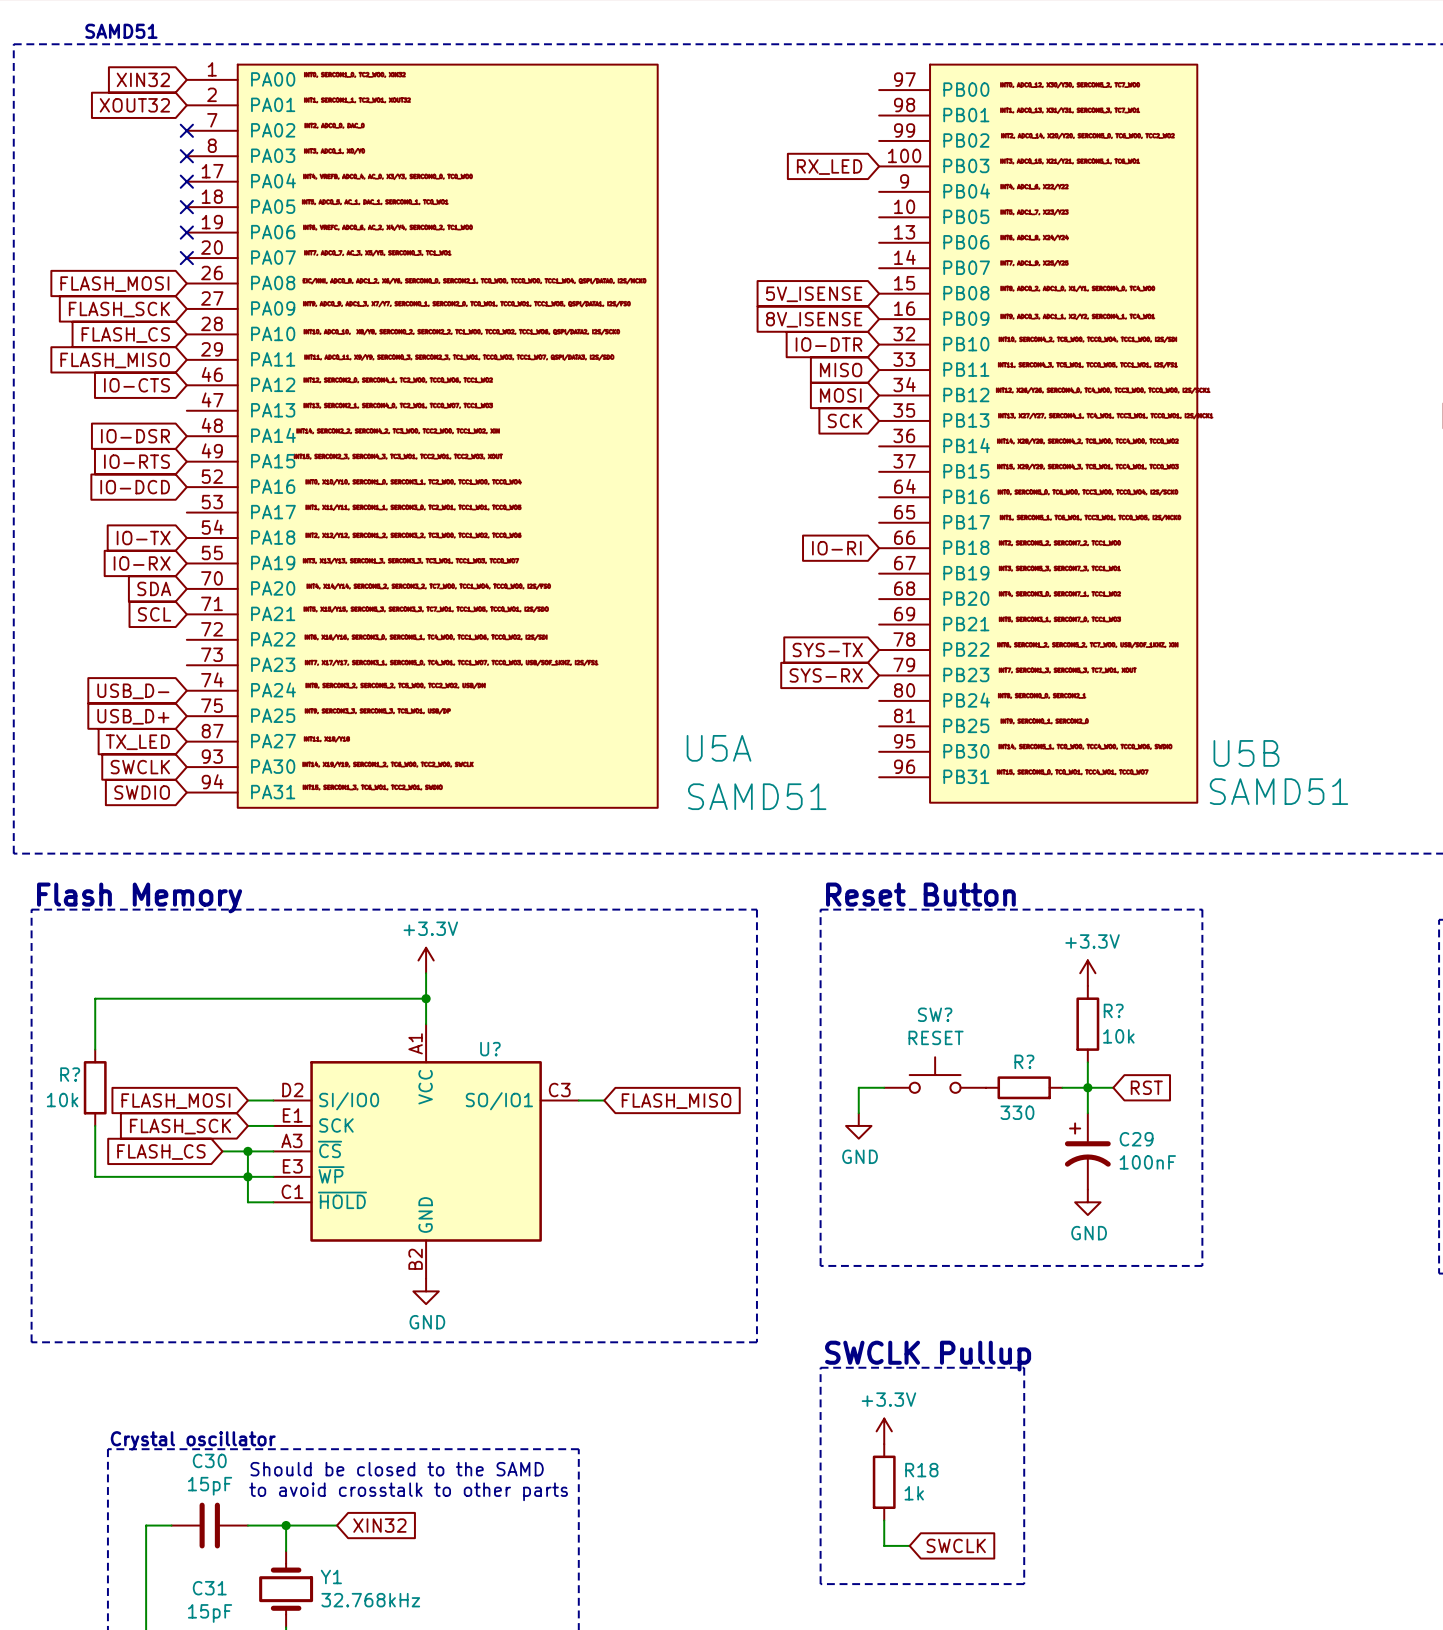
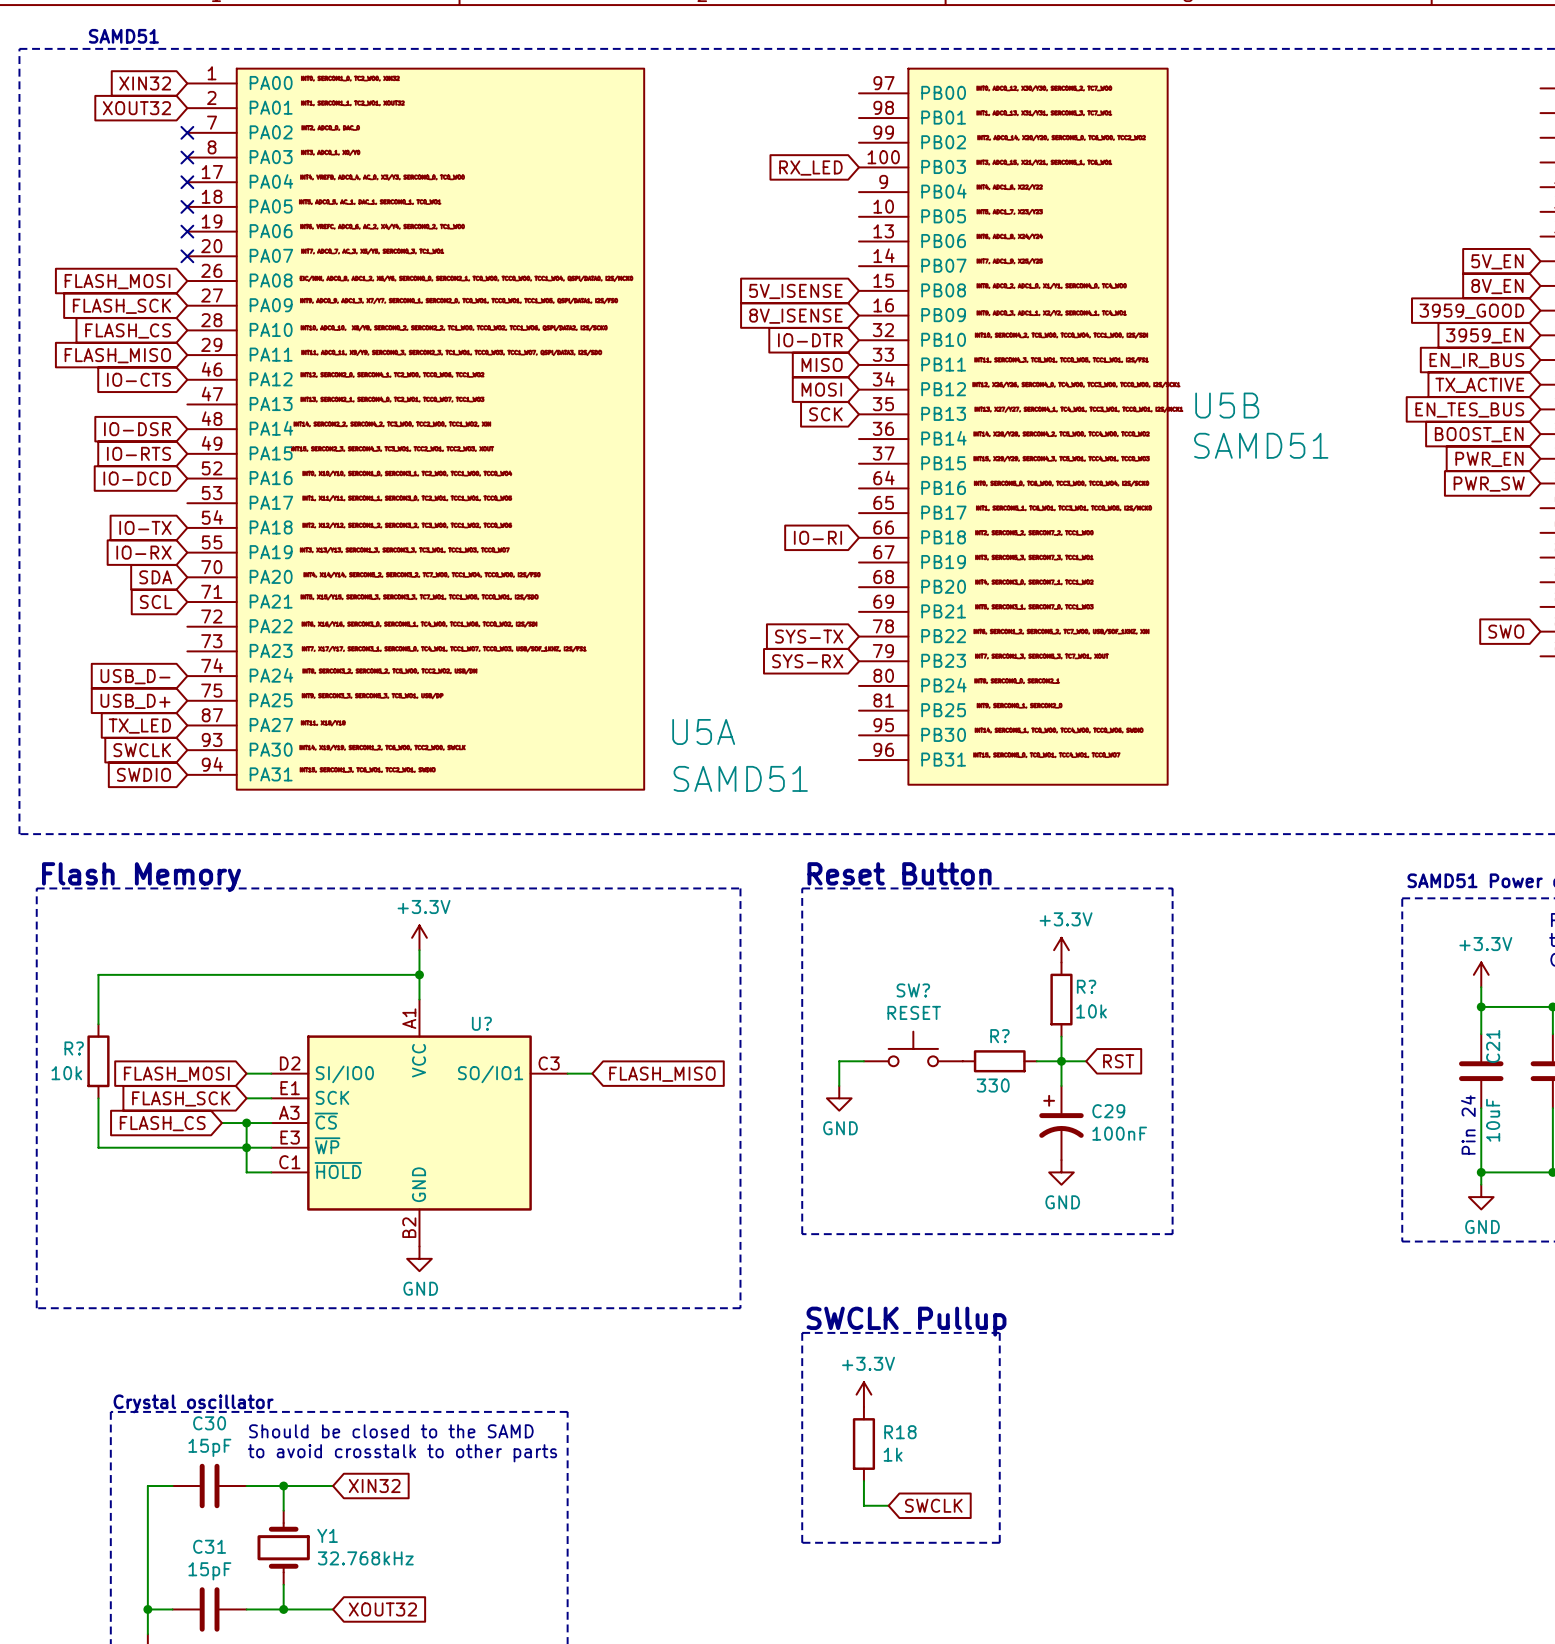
U5B name position: U5B (1246, 753) -> U5B (1227, 405)
U5B value position: SAMD51 (1278, 791) -> SAMD51 (1261, 445)

